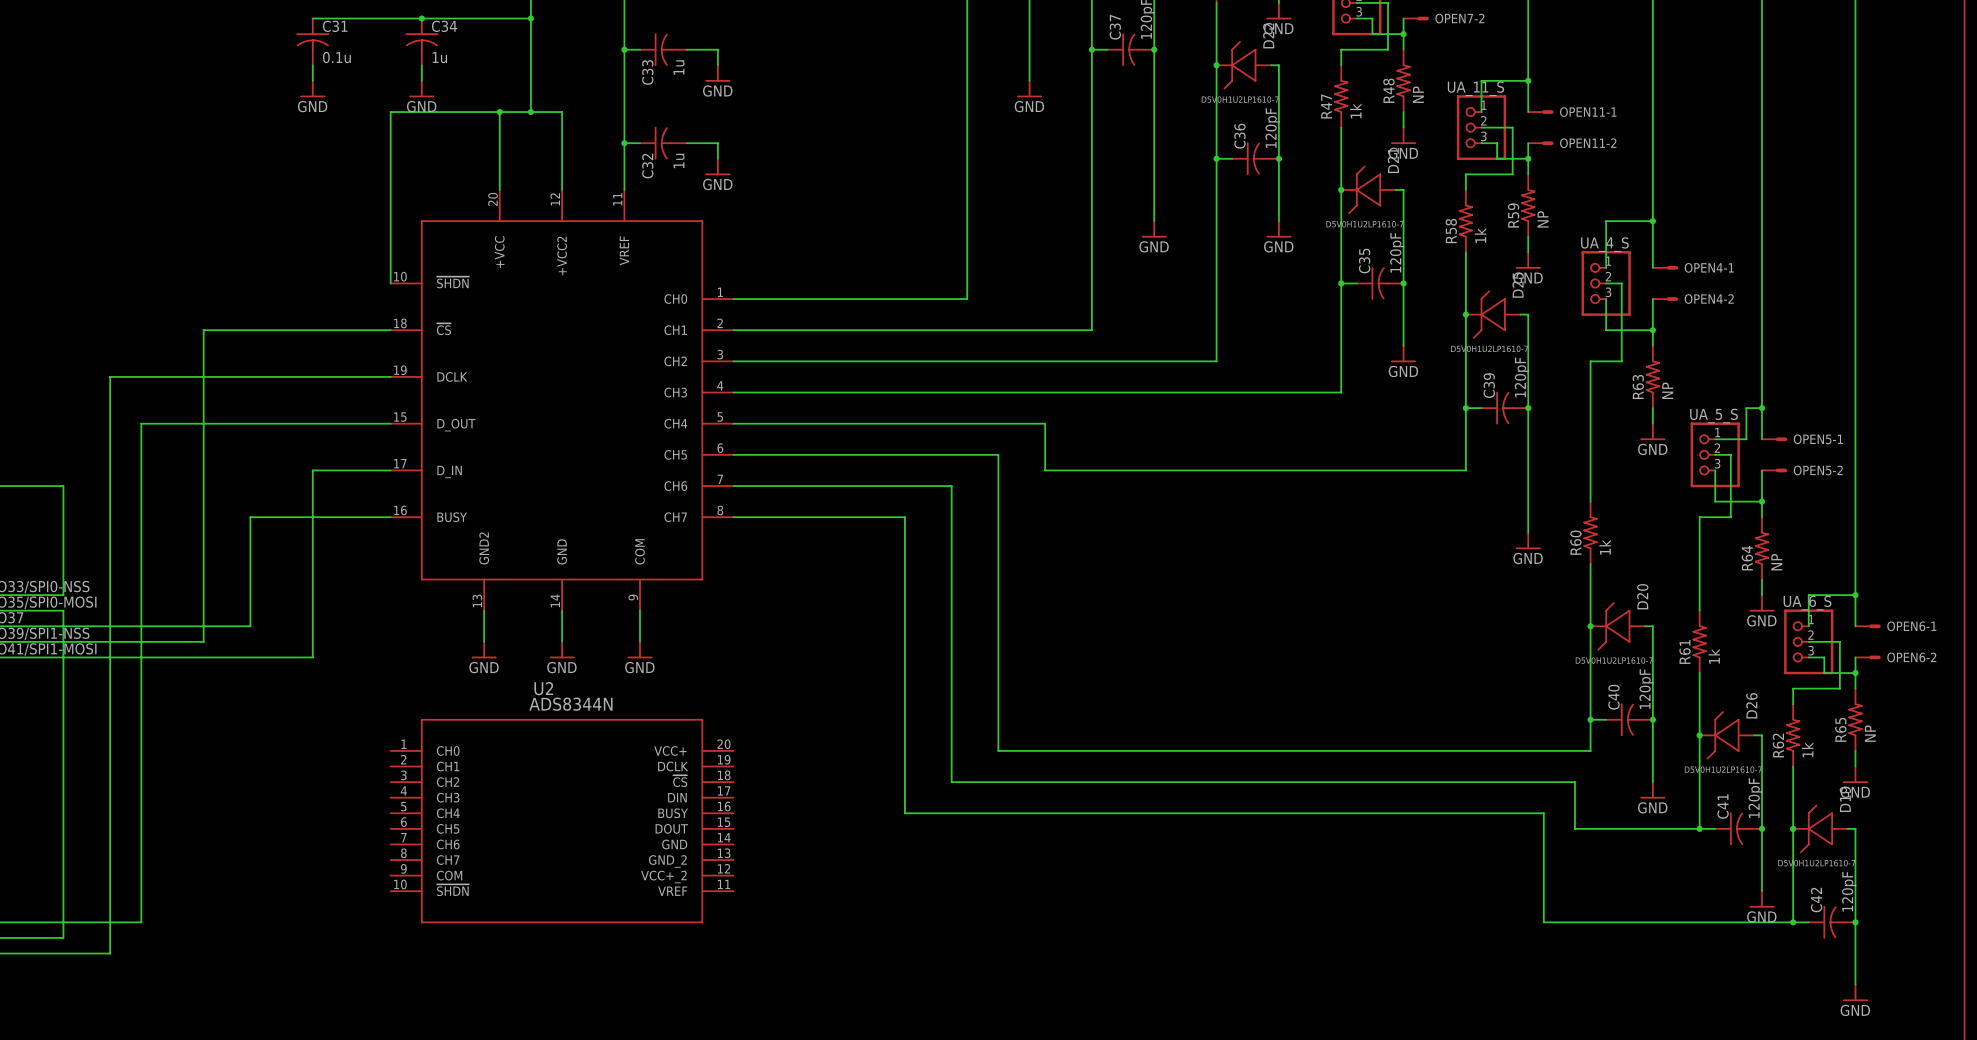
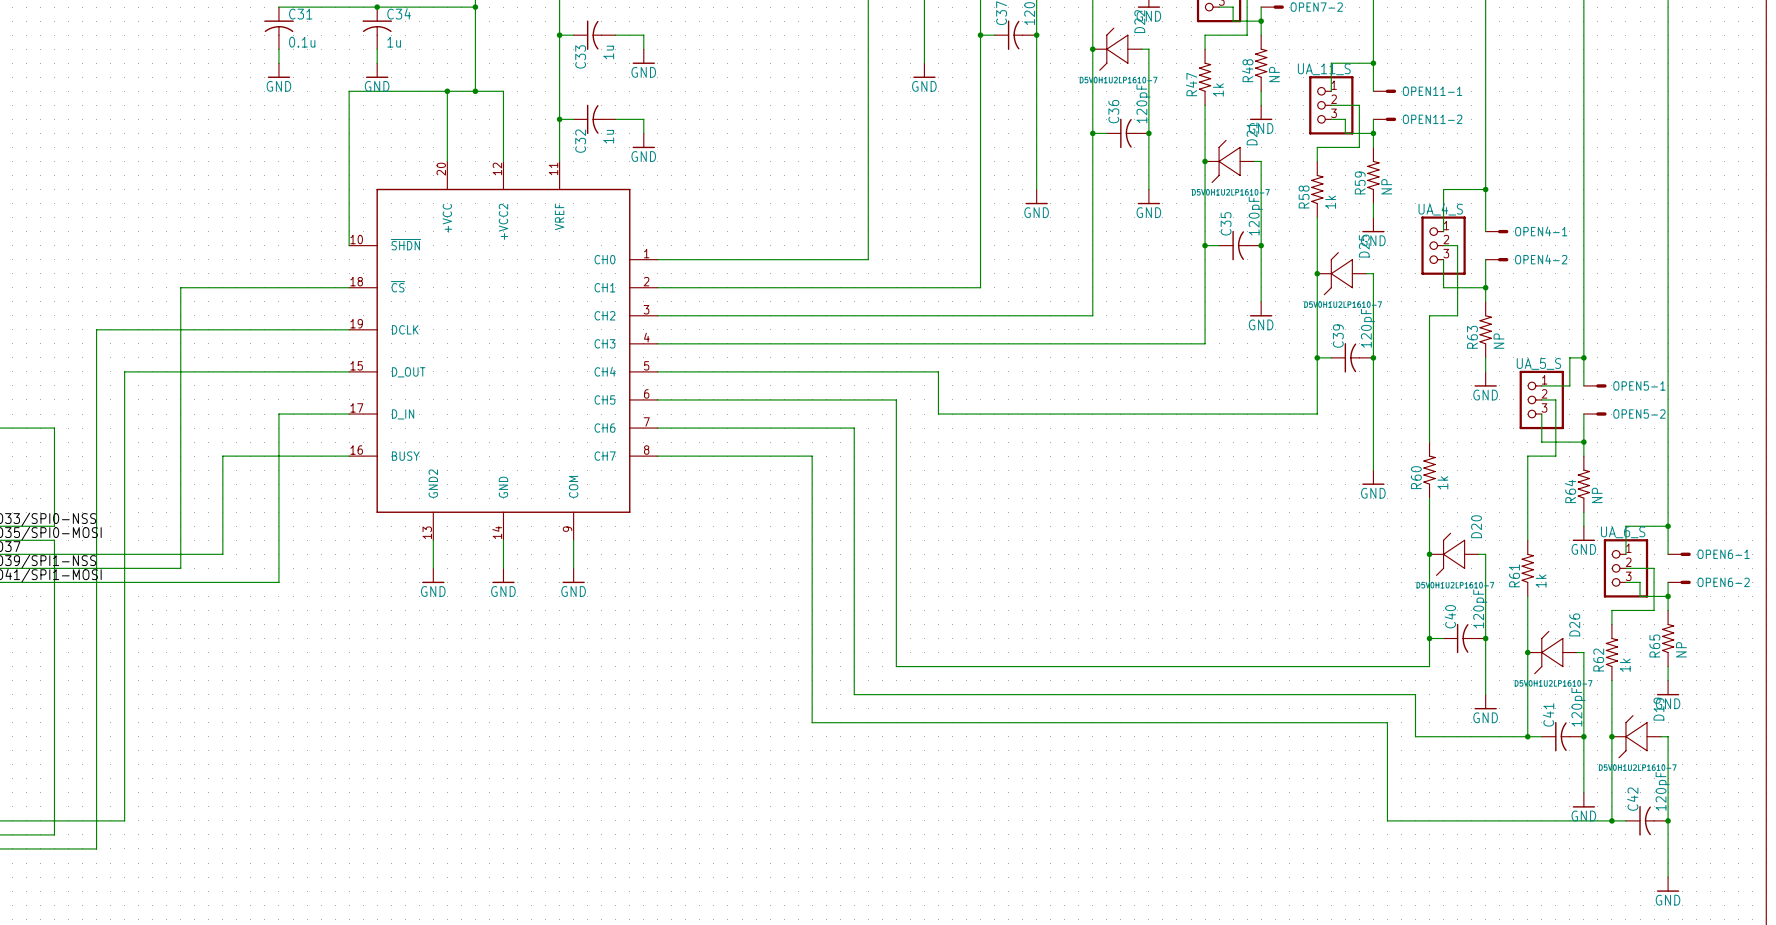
U2: ADS8344N (562, 821) -> none

